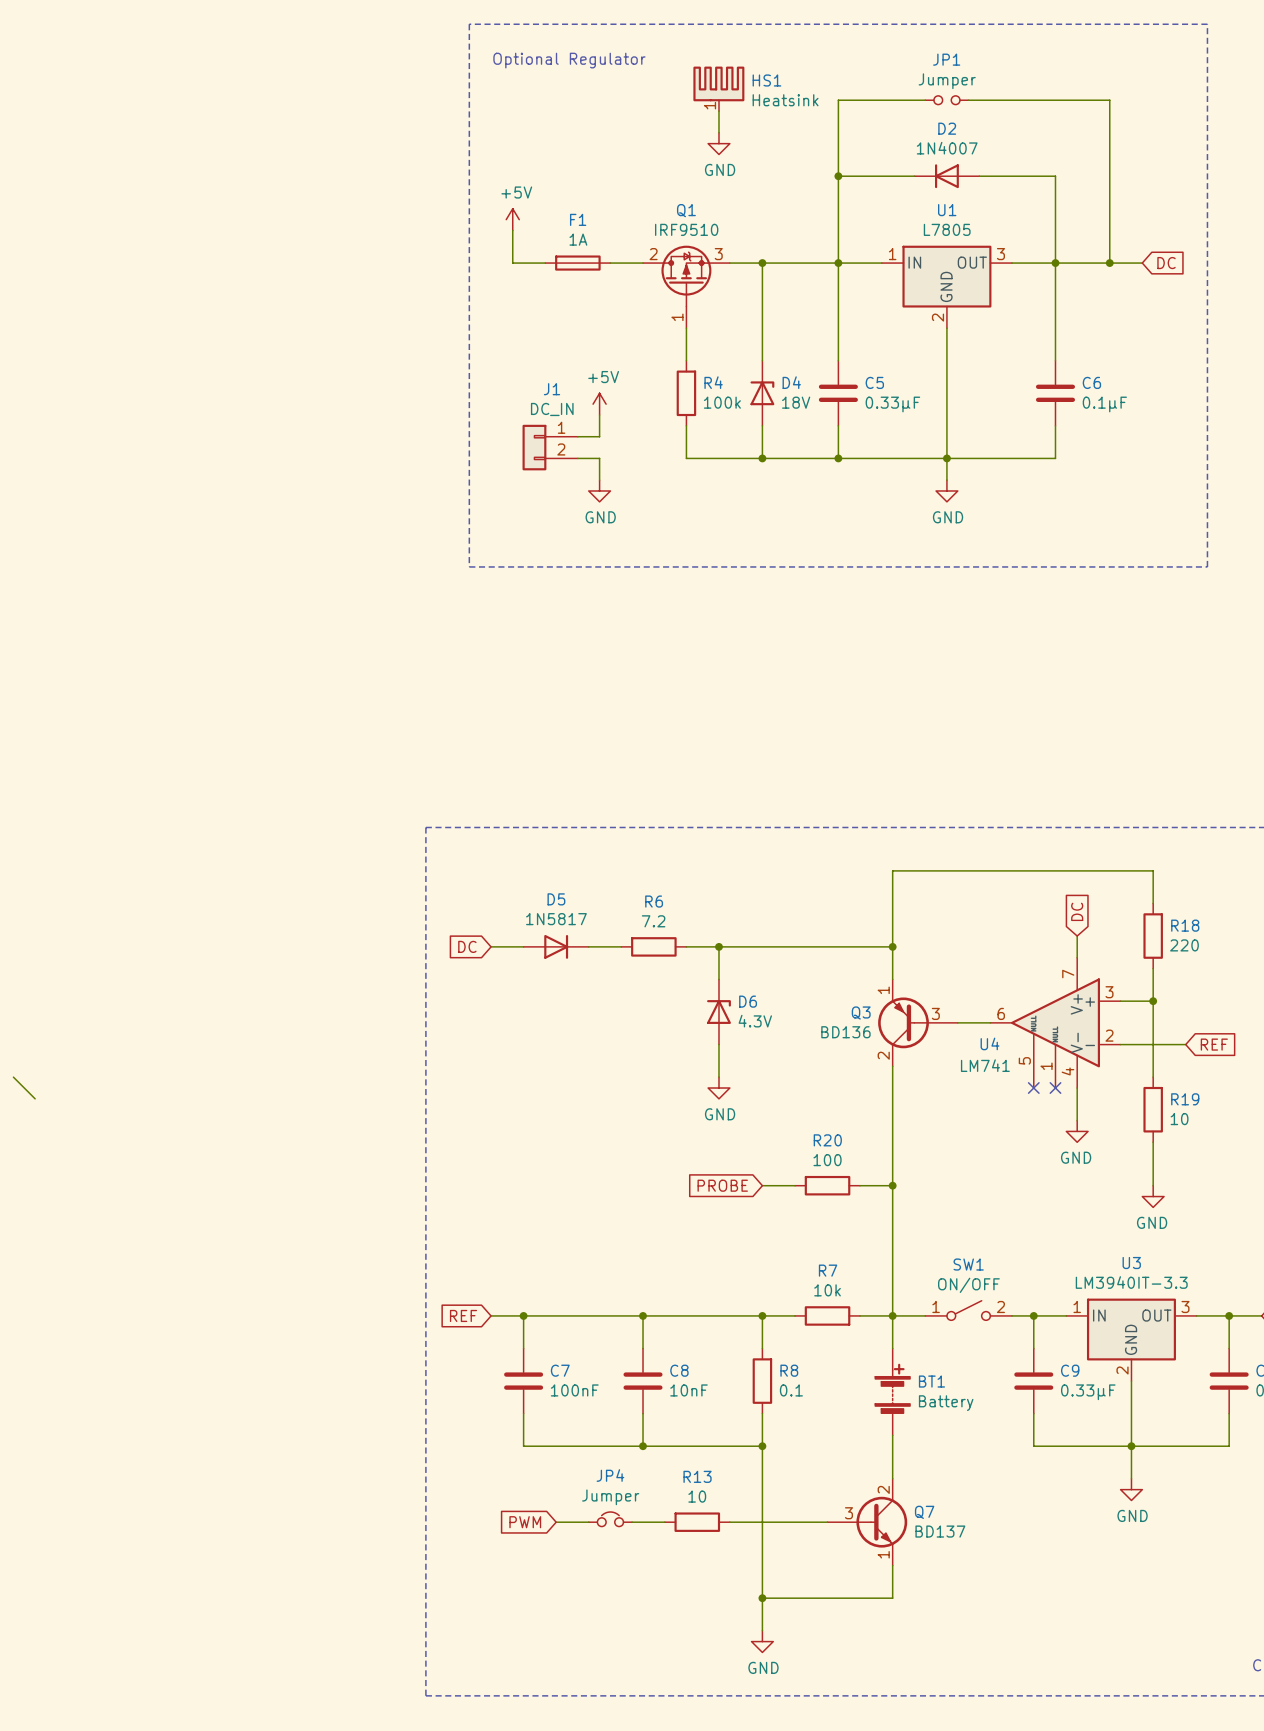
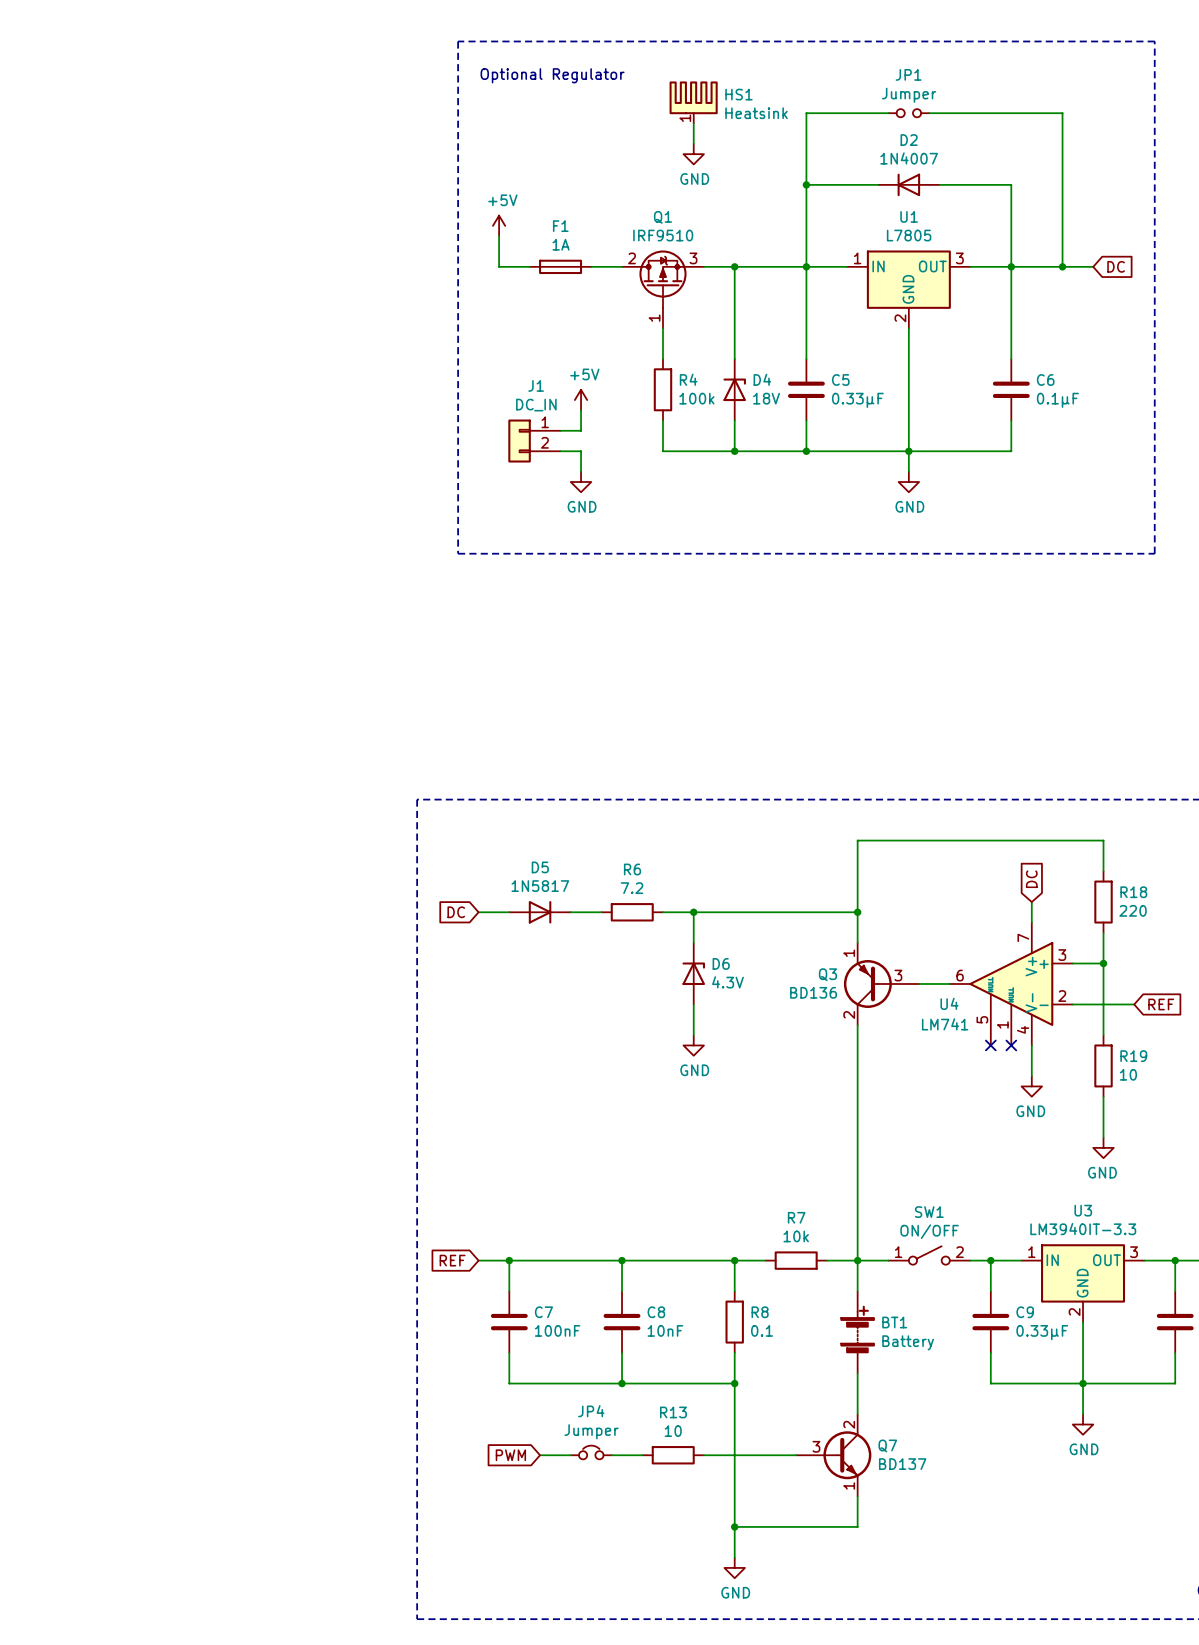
wire: (13, 1077) (35, 1098) -> none
global label: PROBE (722, 1185) -> none
wire: (762, 1185) (794, 1185) -> none
R20: 100 (827, 1185) -> none
wire: (860, 1185) (892, 1185) -> none
junction: (892, 1185) -> none

